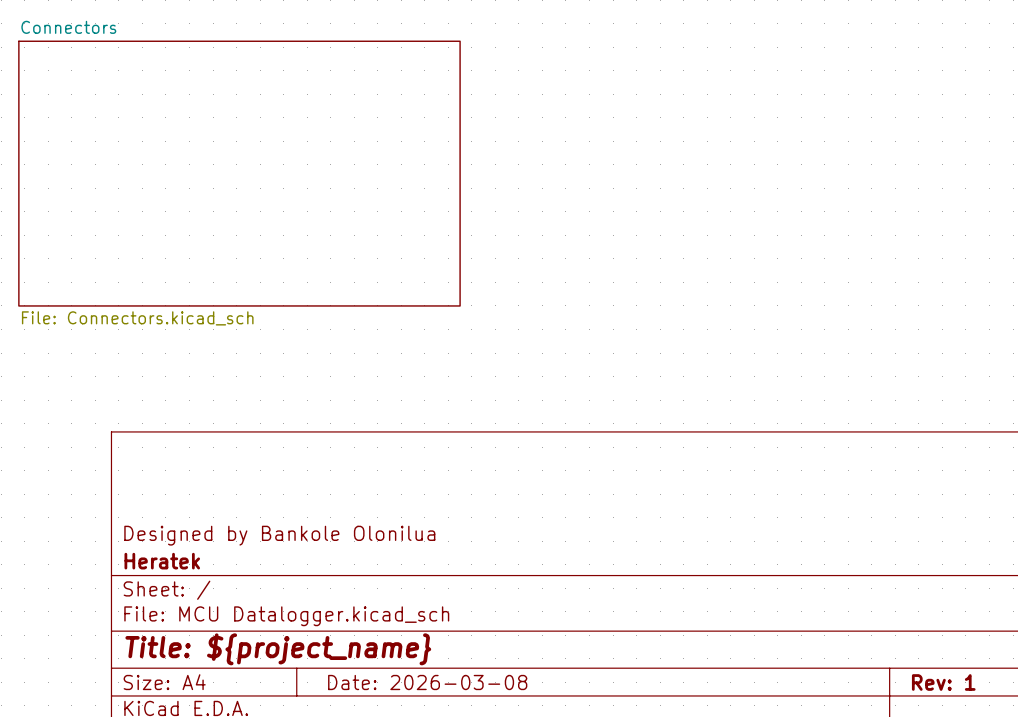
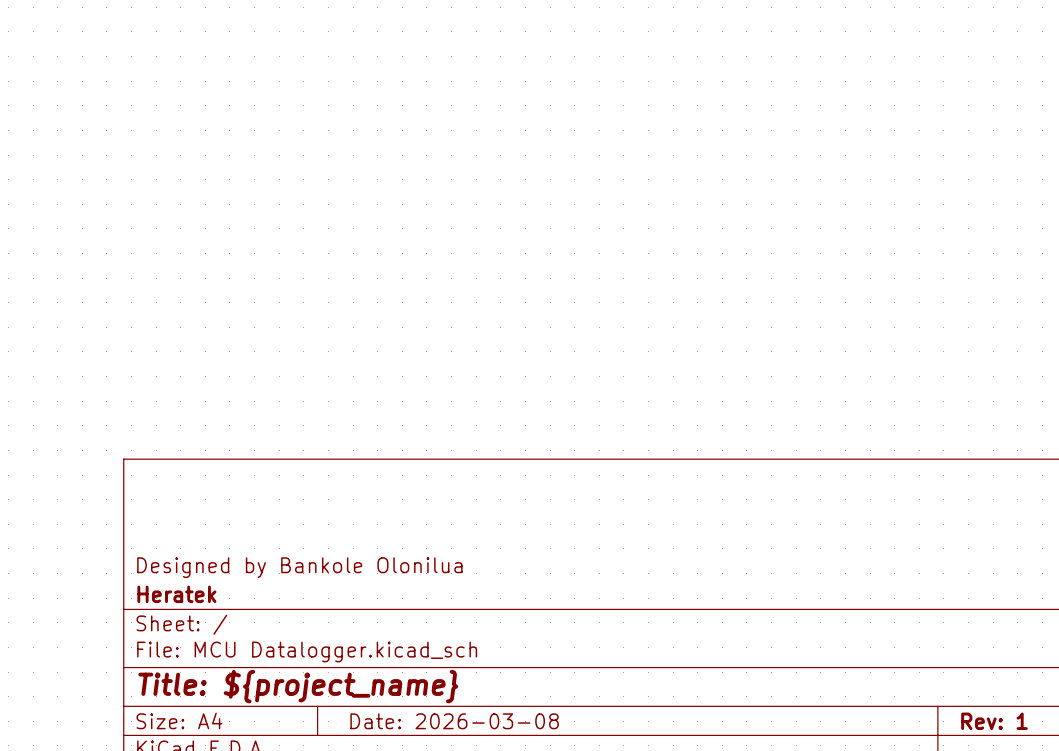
sheet Connectors: File: Connectors.kicad_sch (239, 173) -> none

